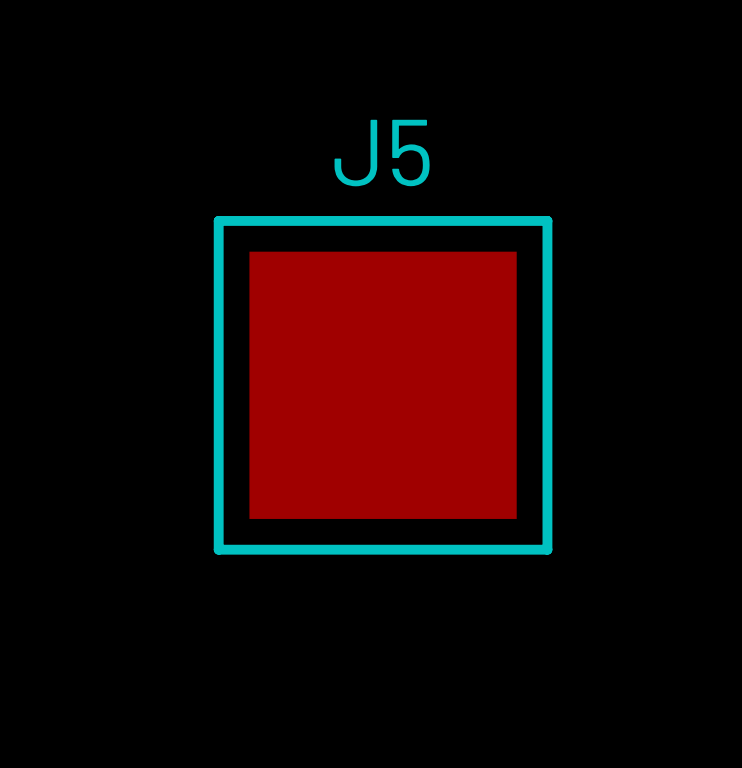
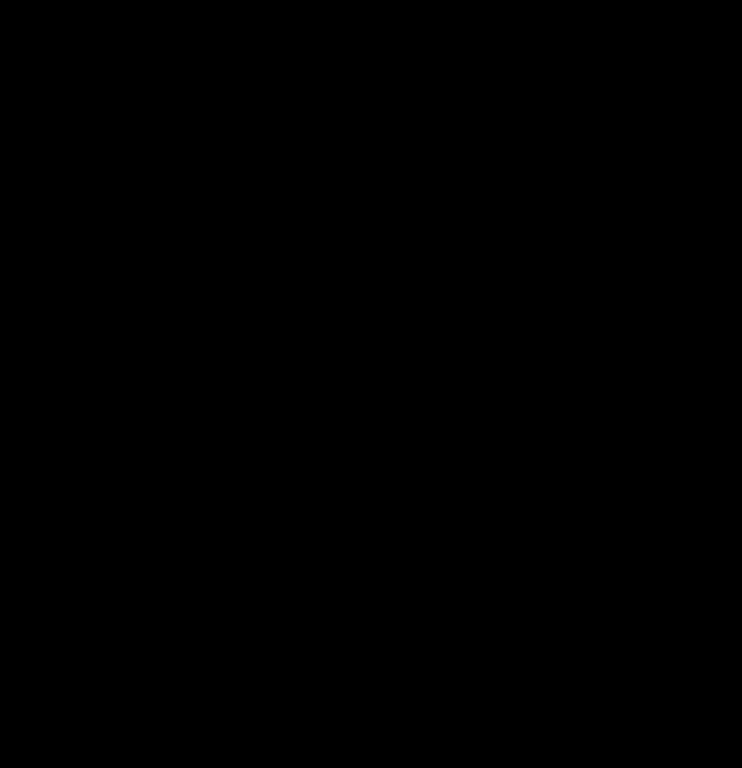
J5: (383, 385) -> none

